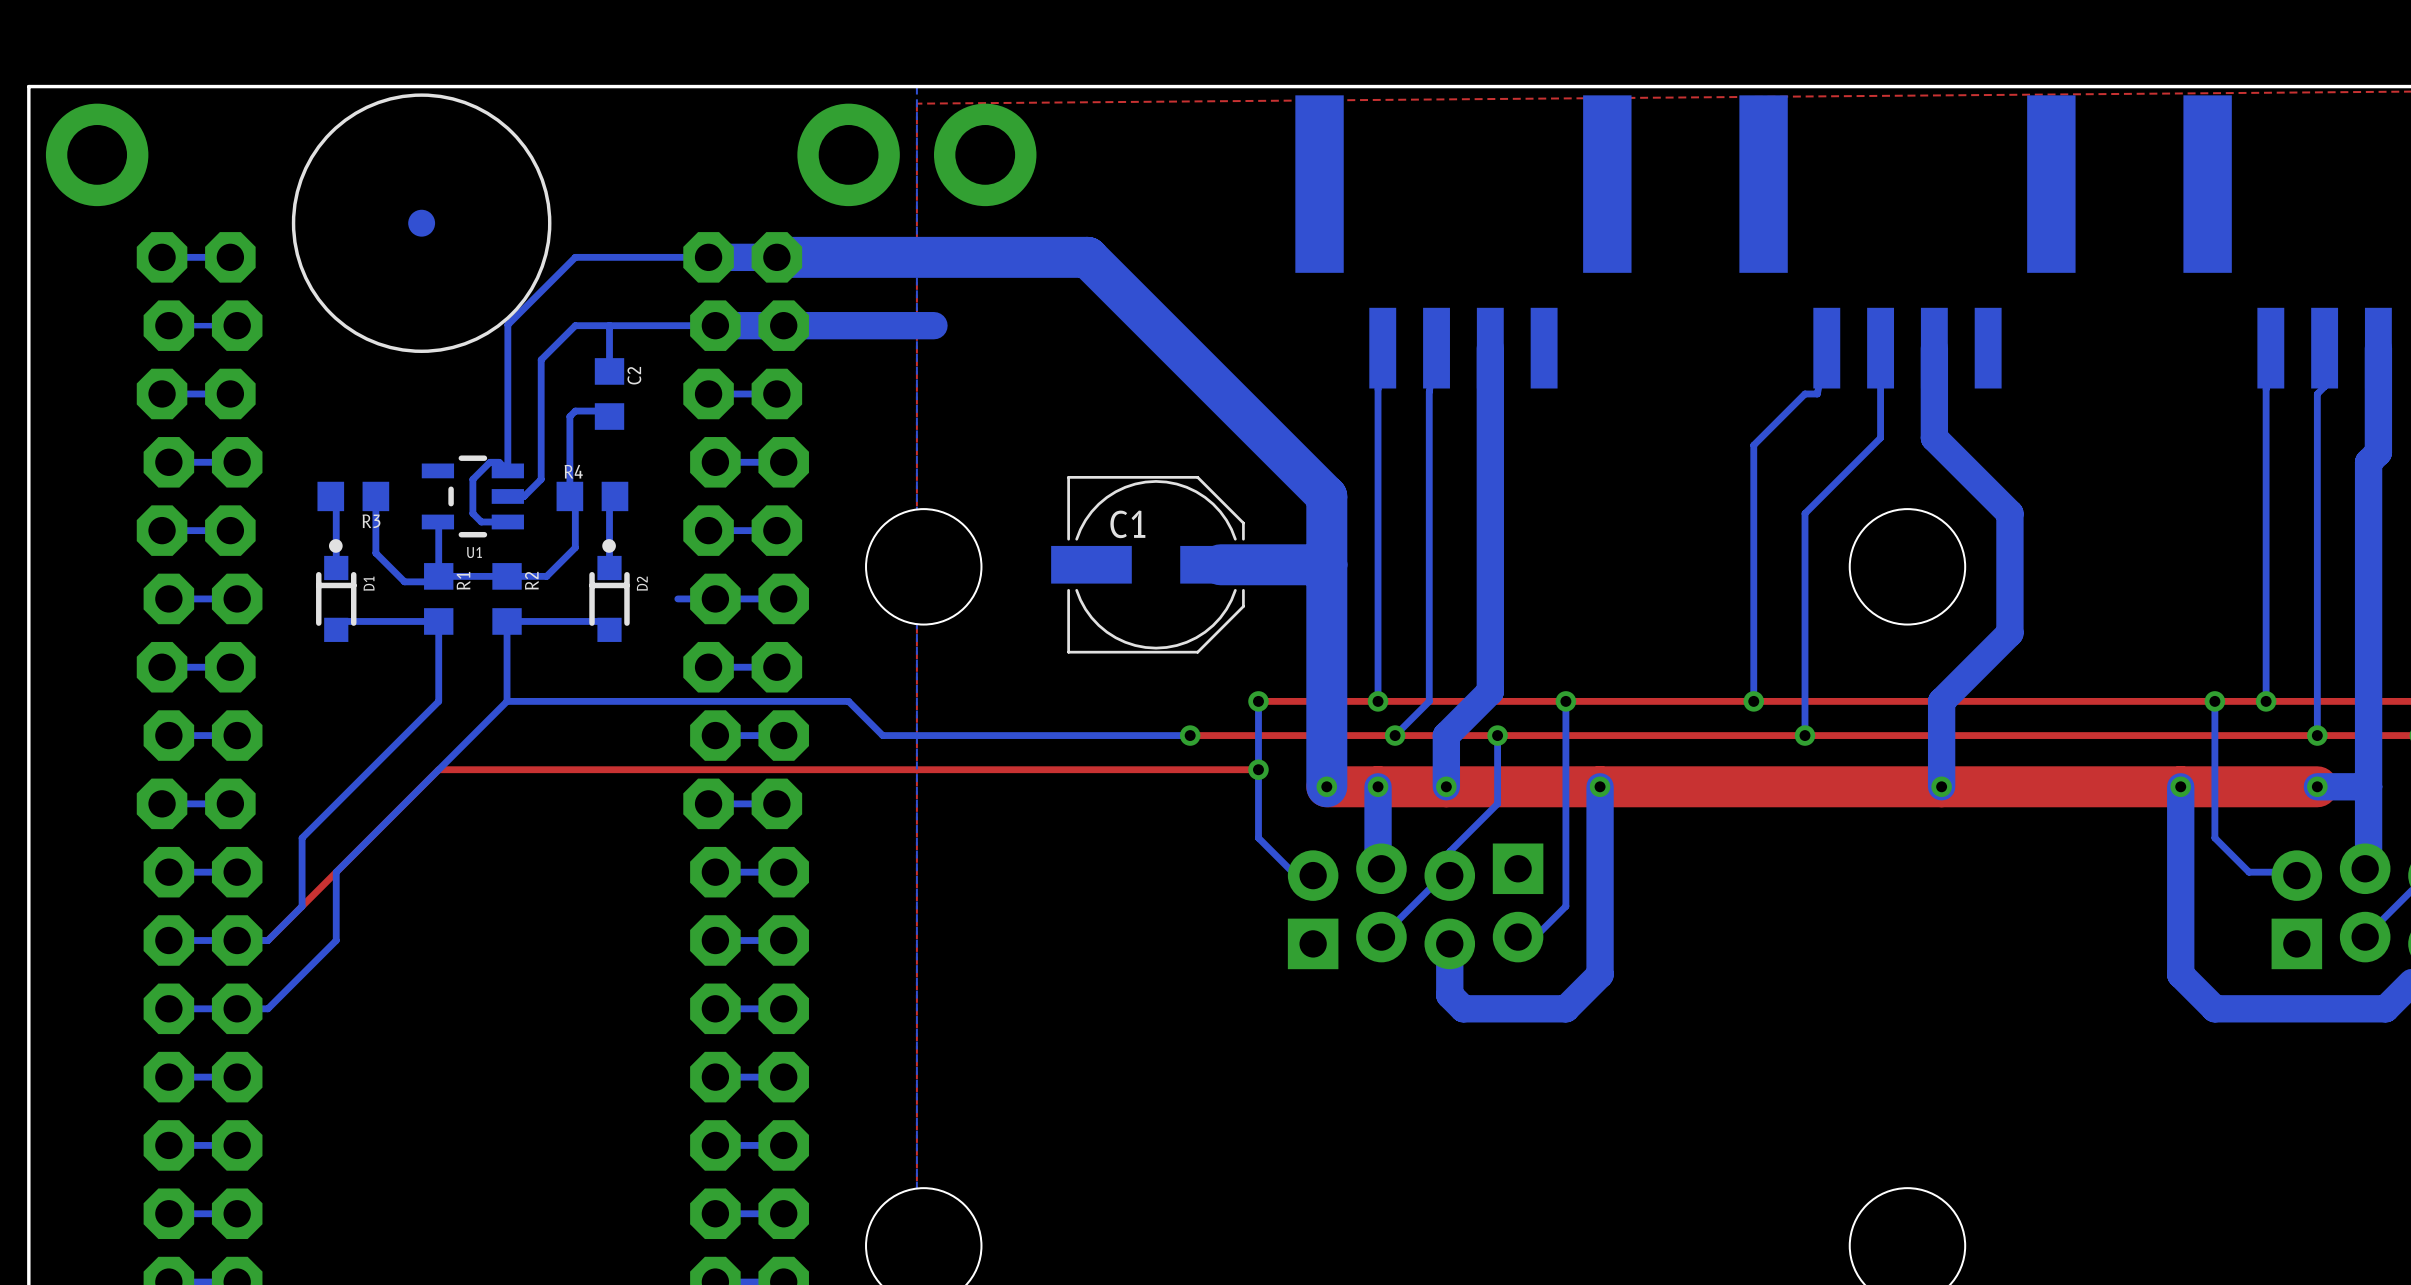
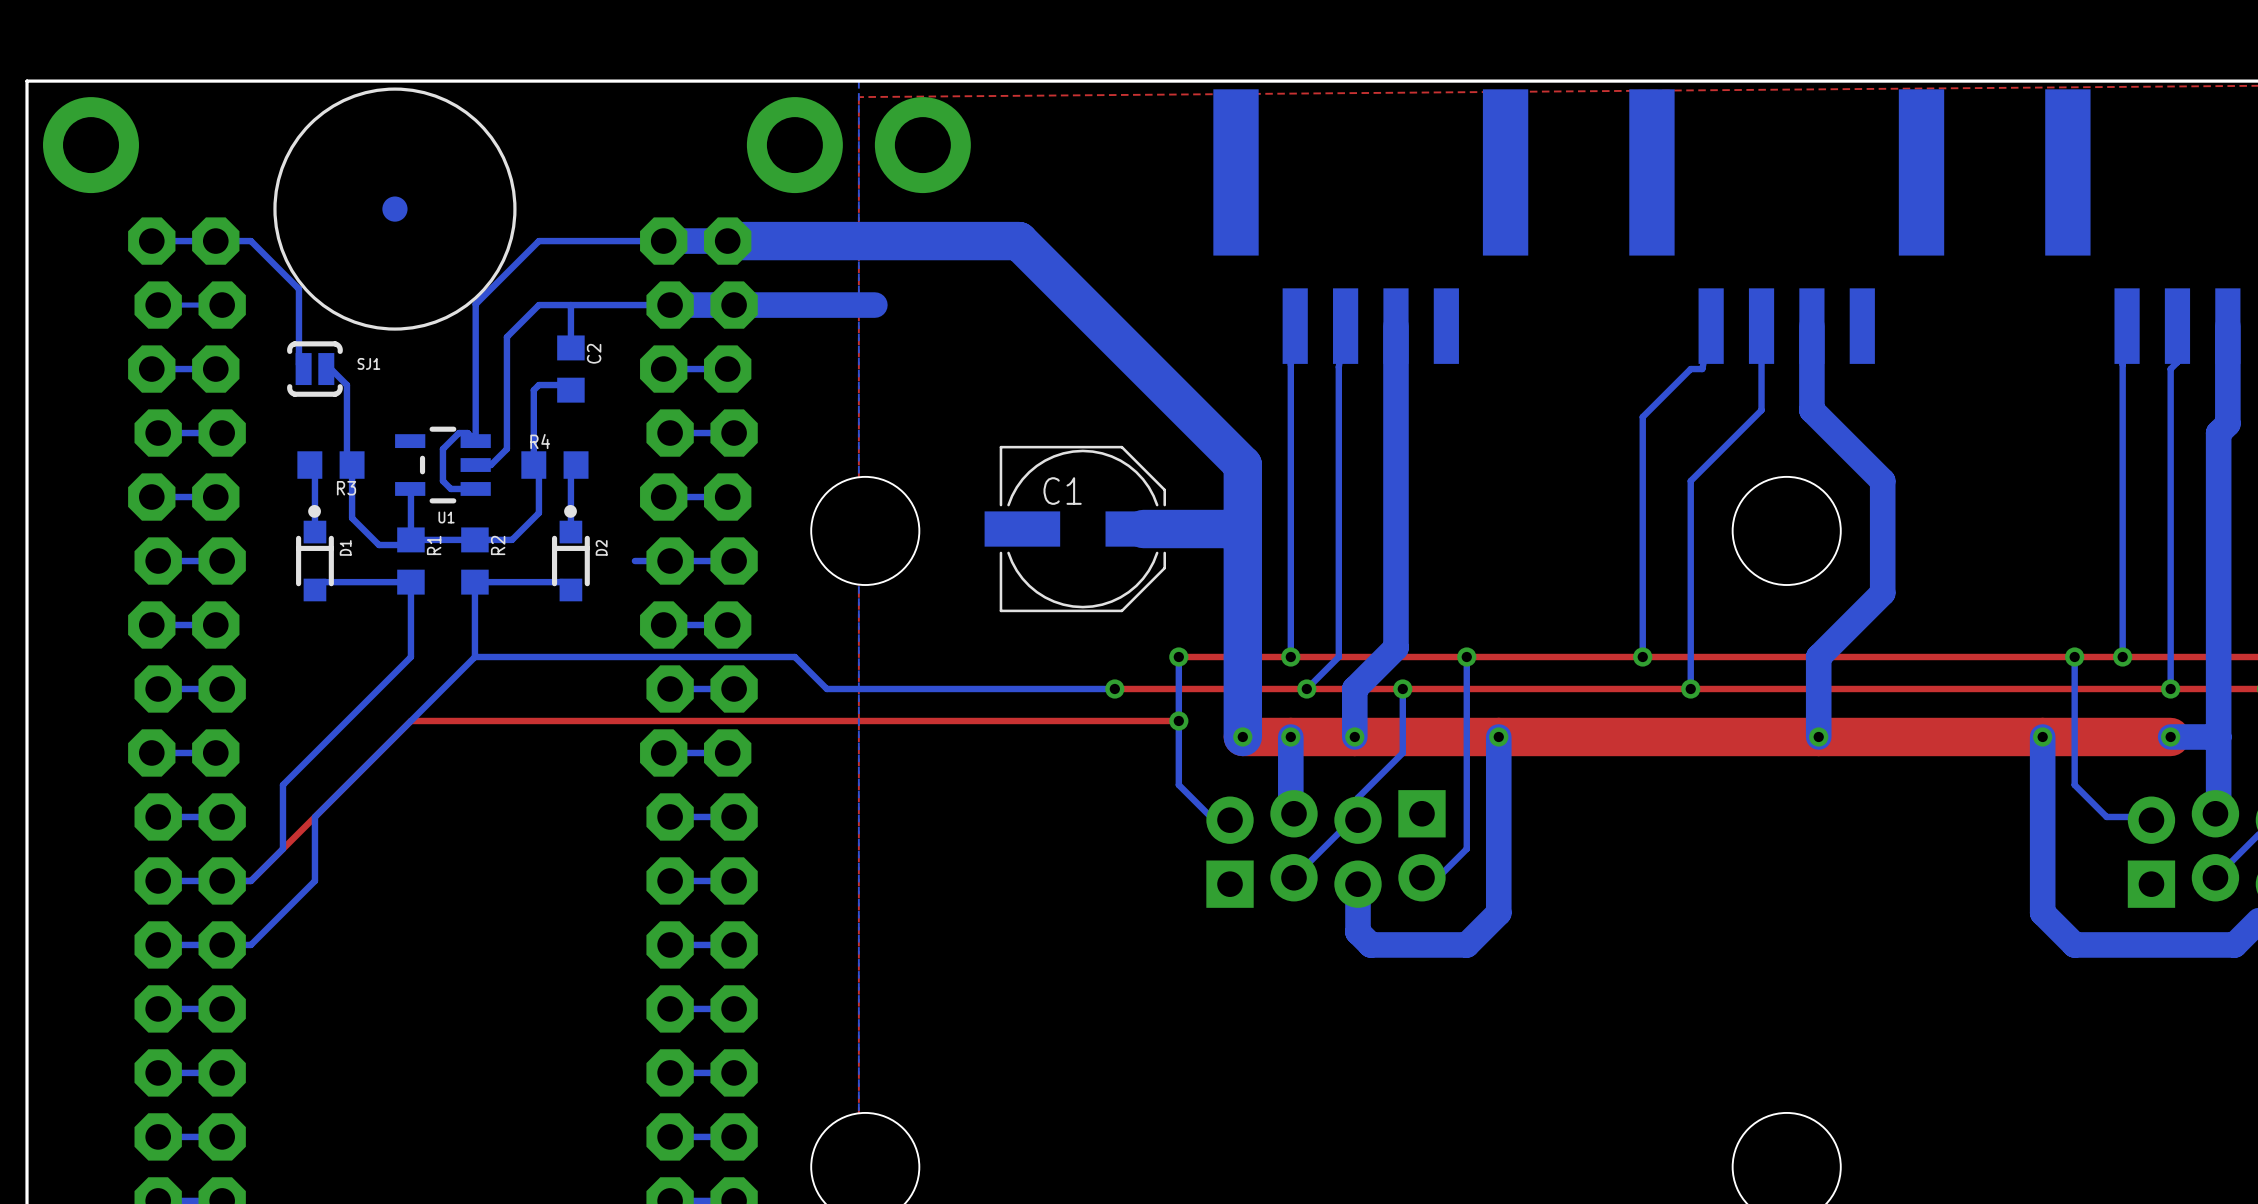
bottom track: none -> (215, 241) (250, 241) (298, 289) (298, 364) (303, 369)
SJ1: none -> (314, 369)
bottom track: none -> (326, 369) (330, 369) (346, 385) (346, 459) (352, 465)

